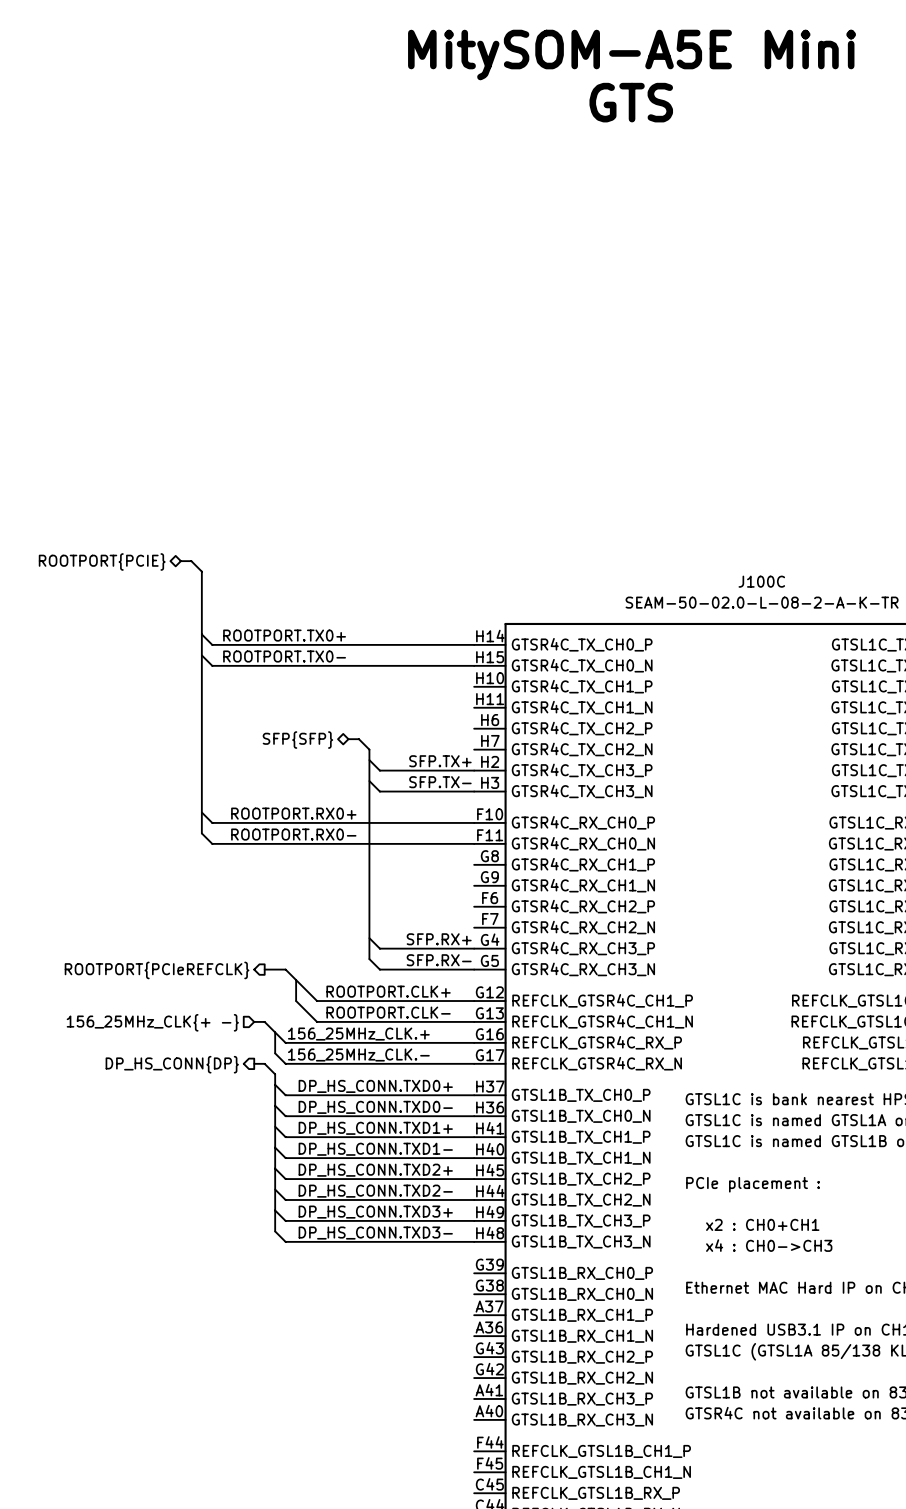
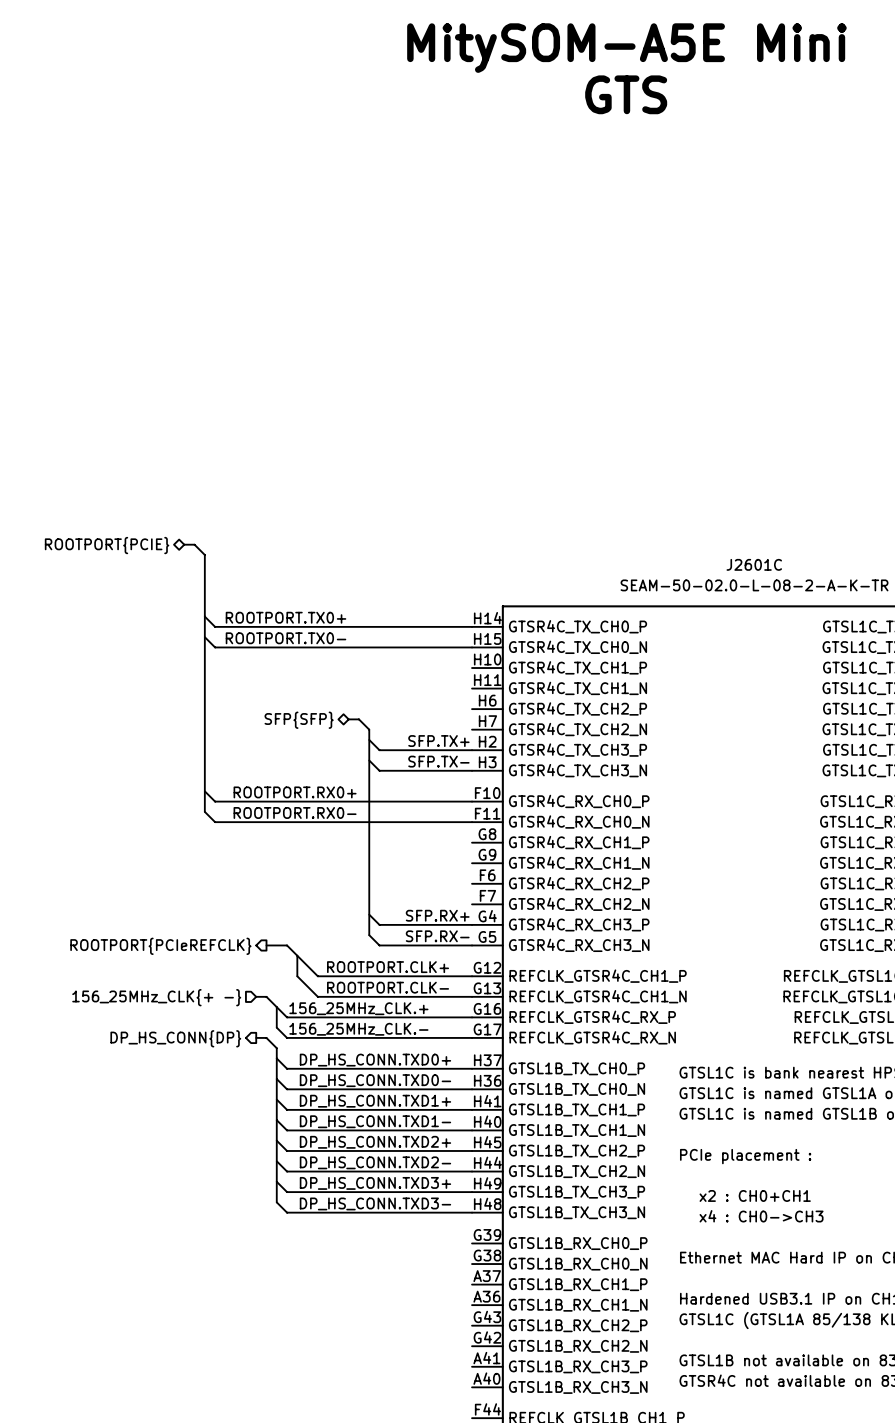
J100C name: J100C (761, 581) -> J2601C (754, 564)

